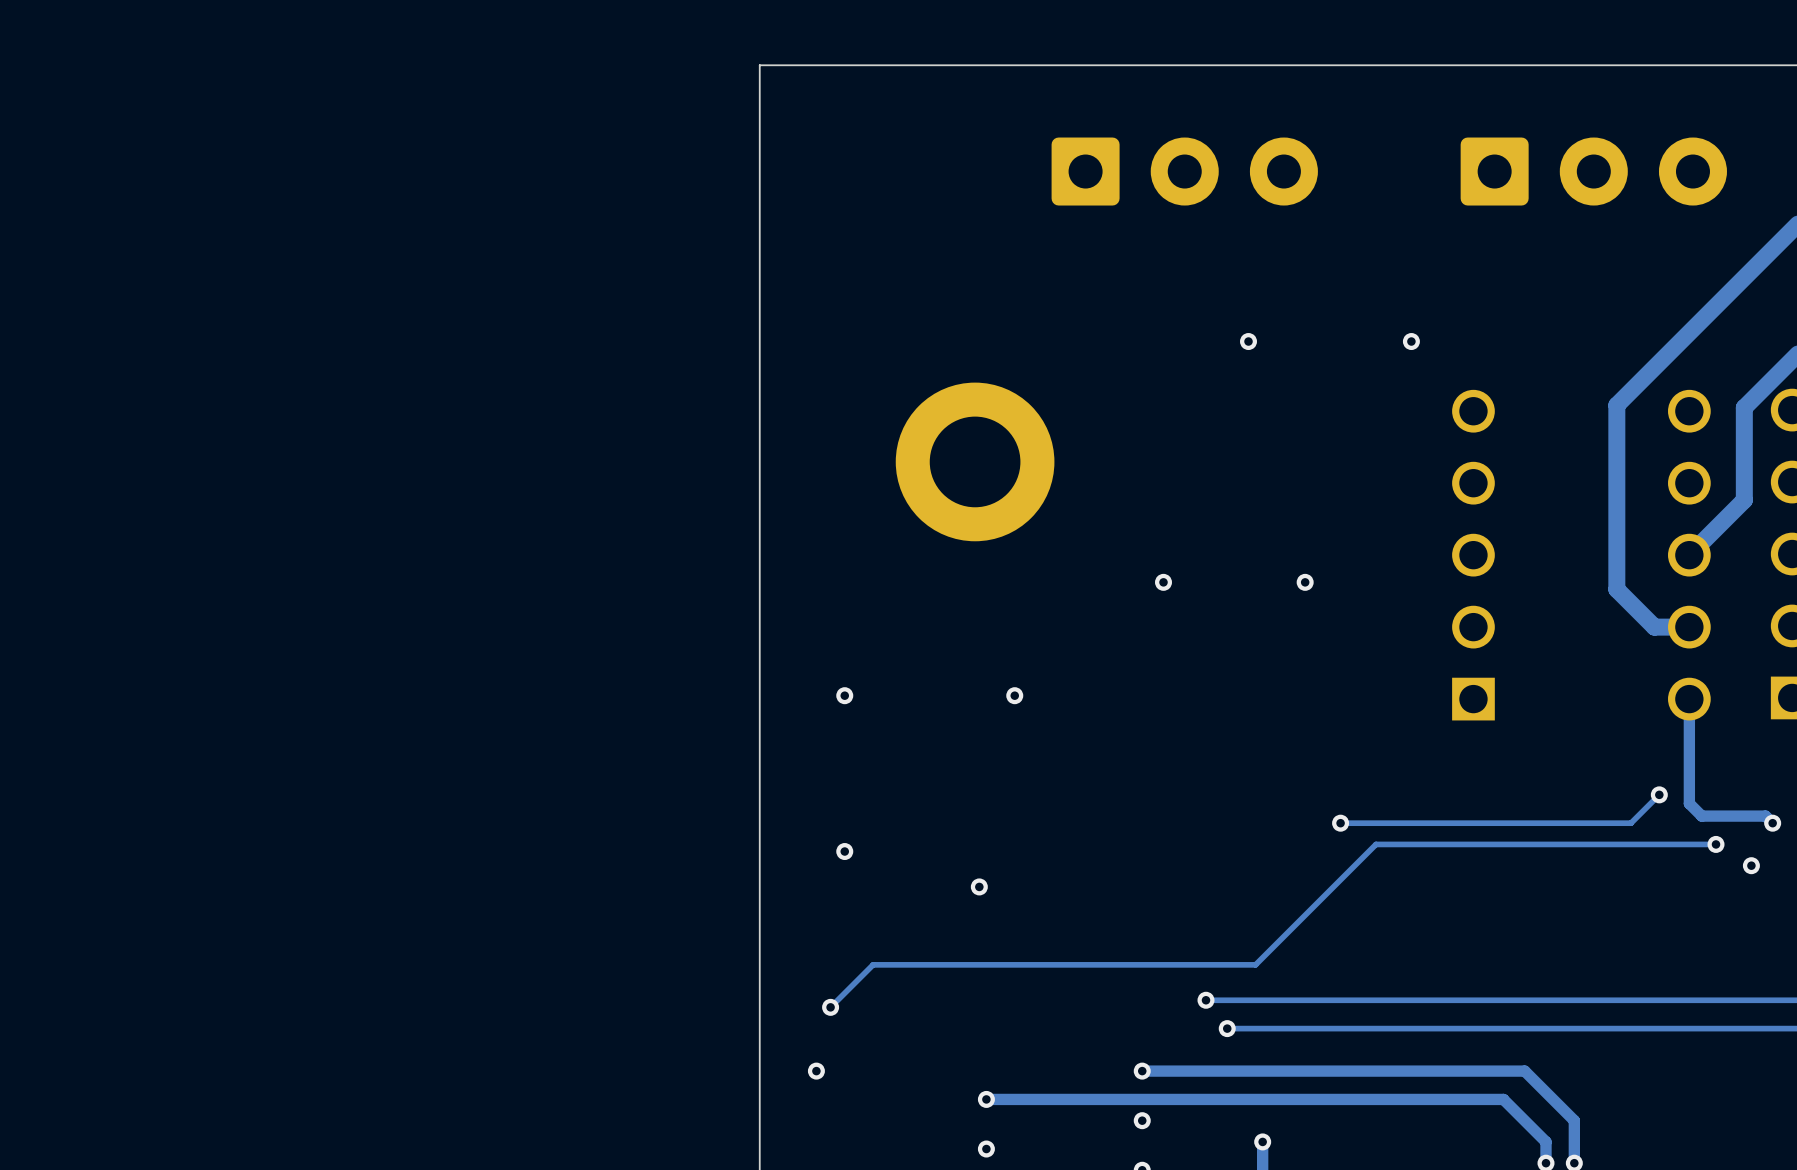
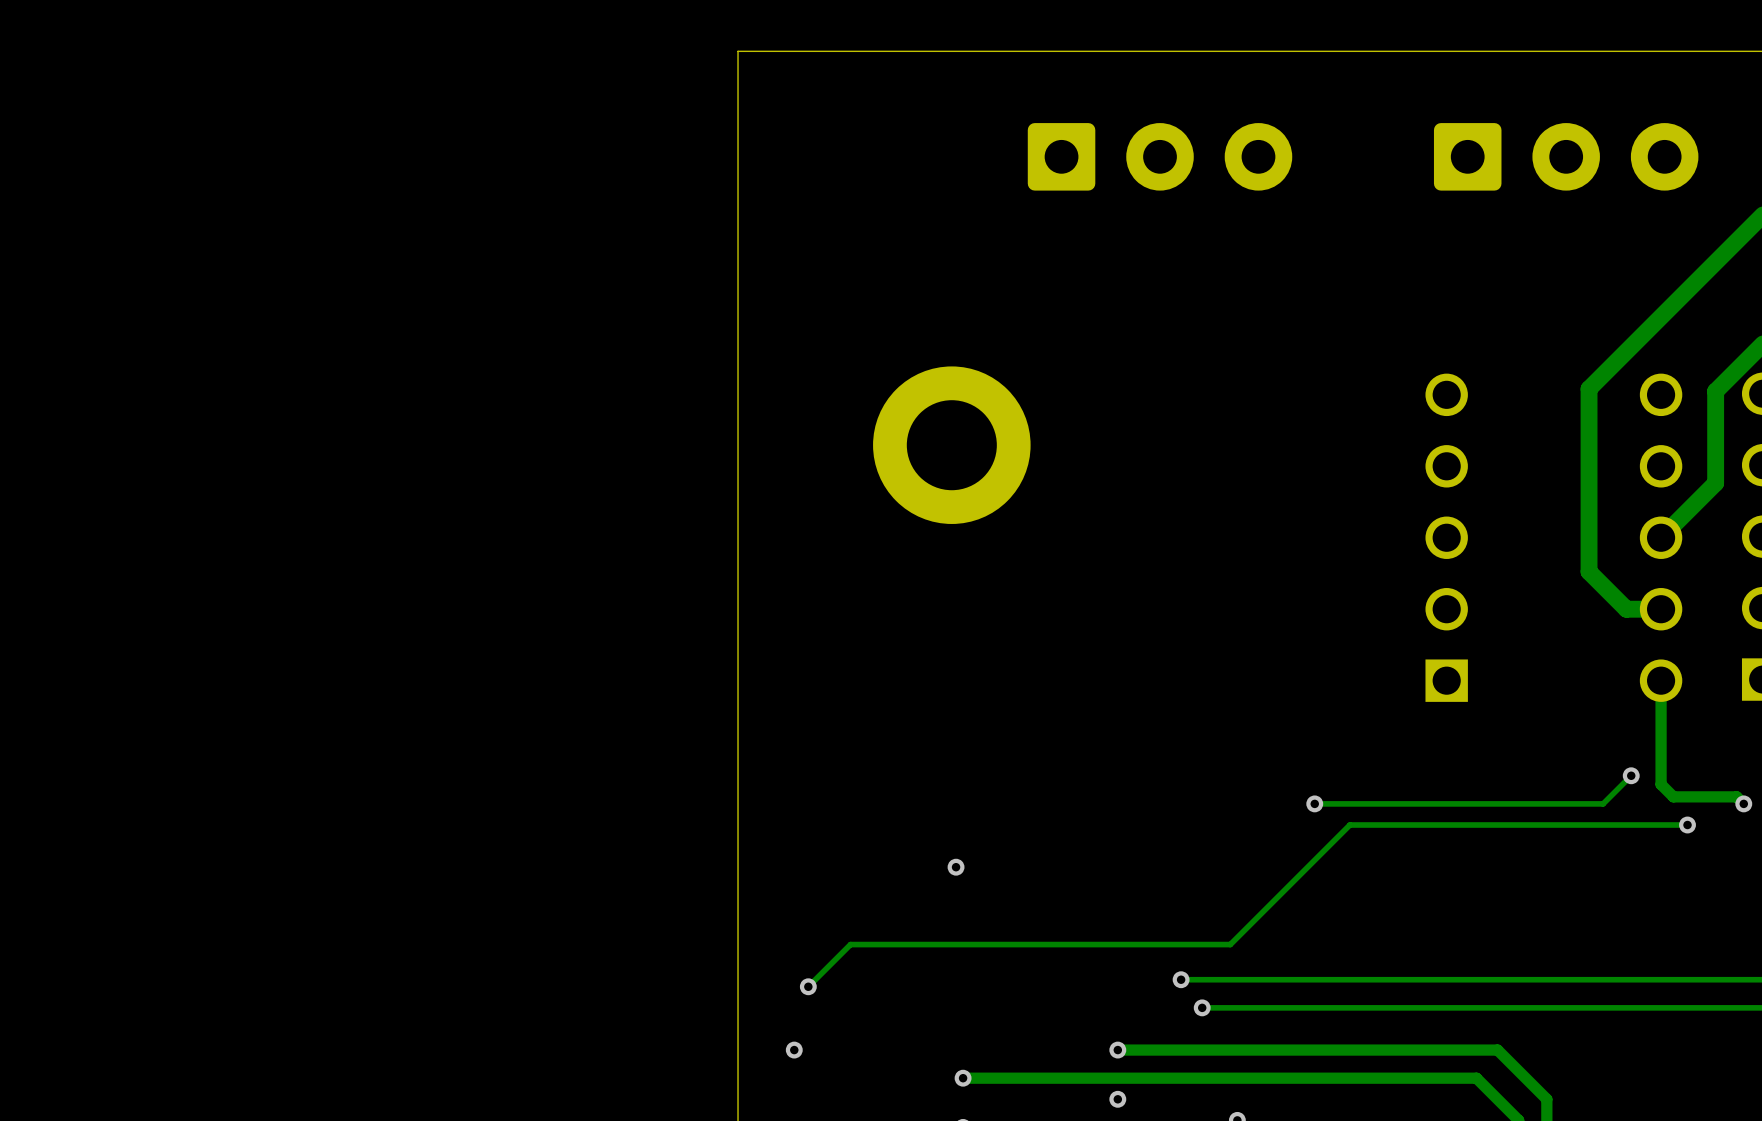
via: (1248, 341) -> none
via: (1411, 341) -> none
via: (1163, 582) -> none
via: (1305, 582) -> none
via: (844, 695) -> none
via: (1014, 695) -> none
via: (844, 851) -> none
via: (1751, 865) -> none

